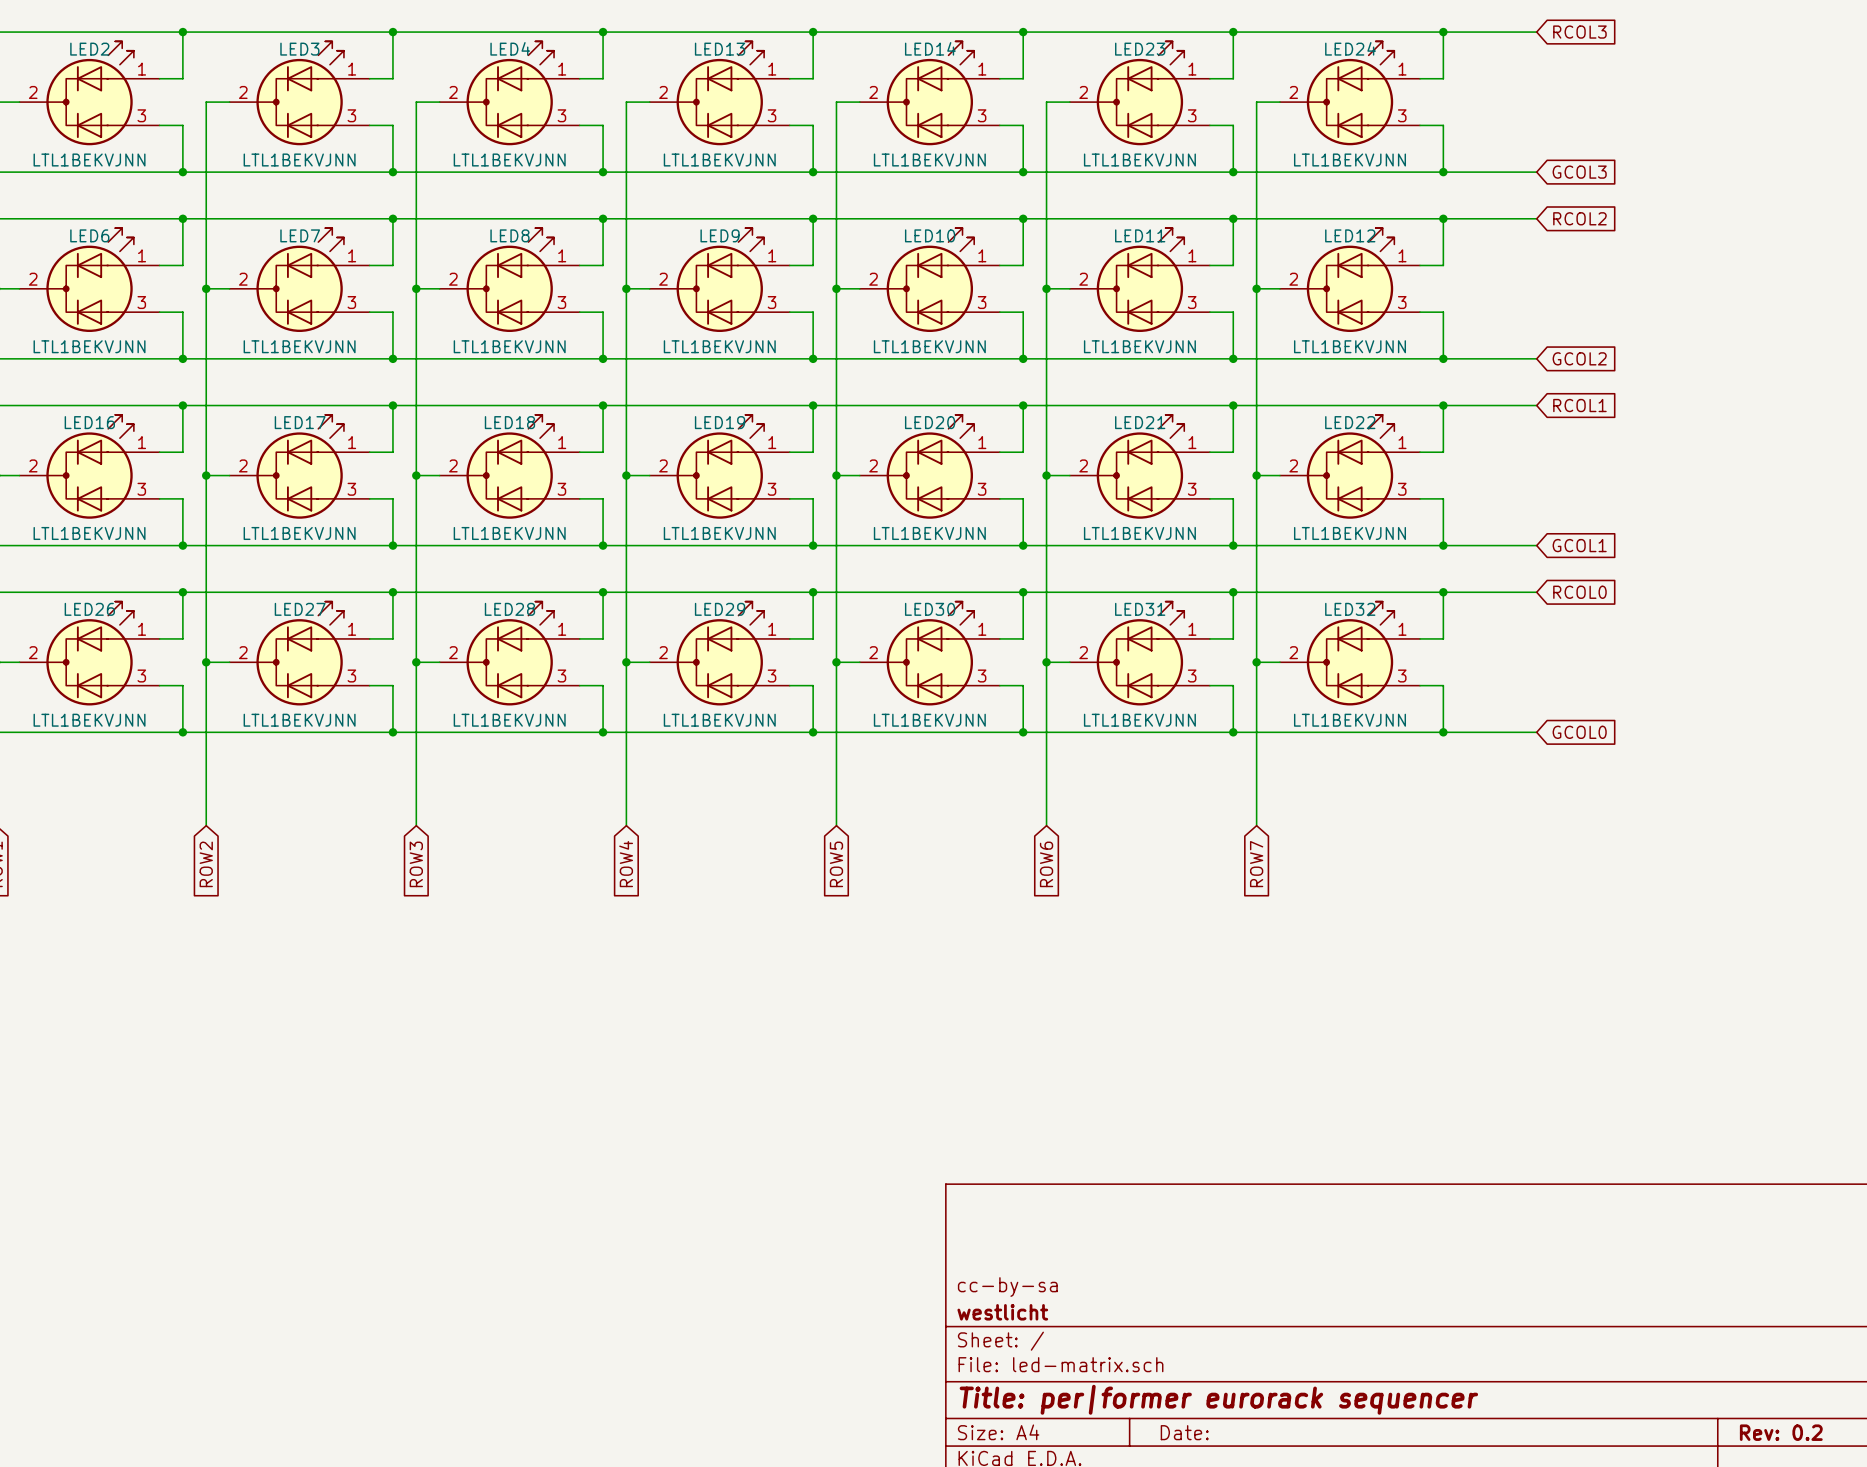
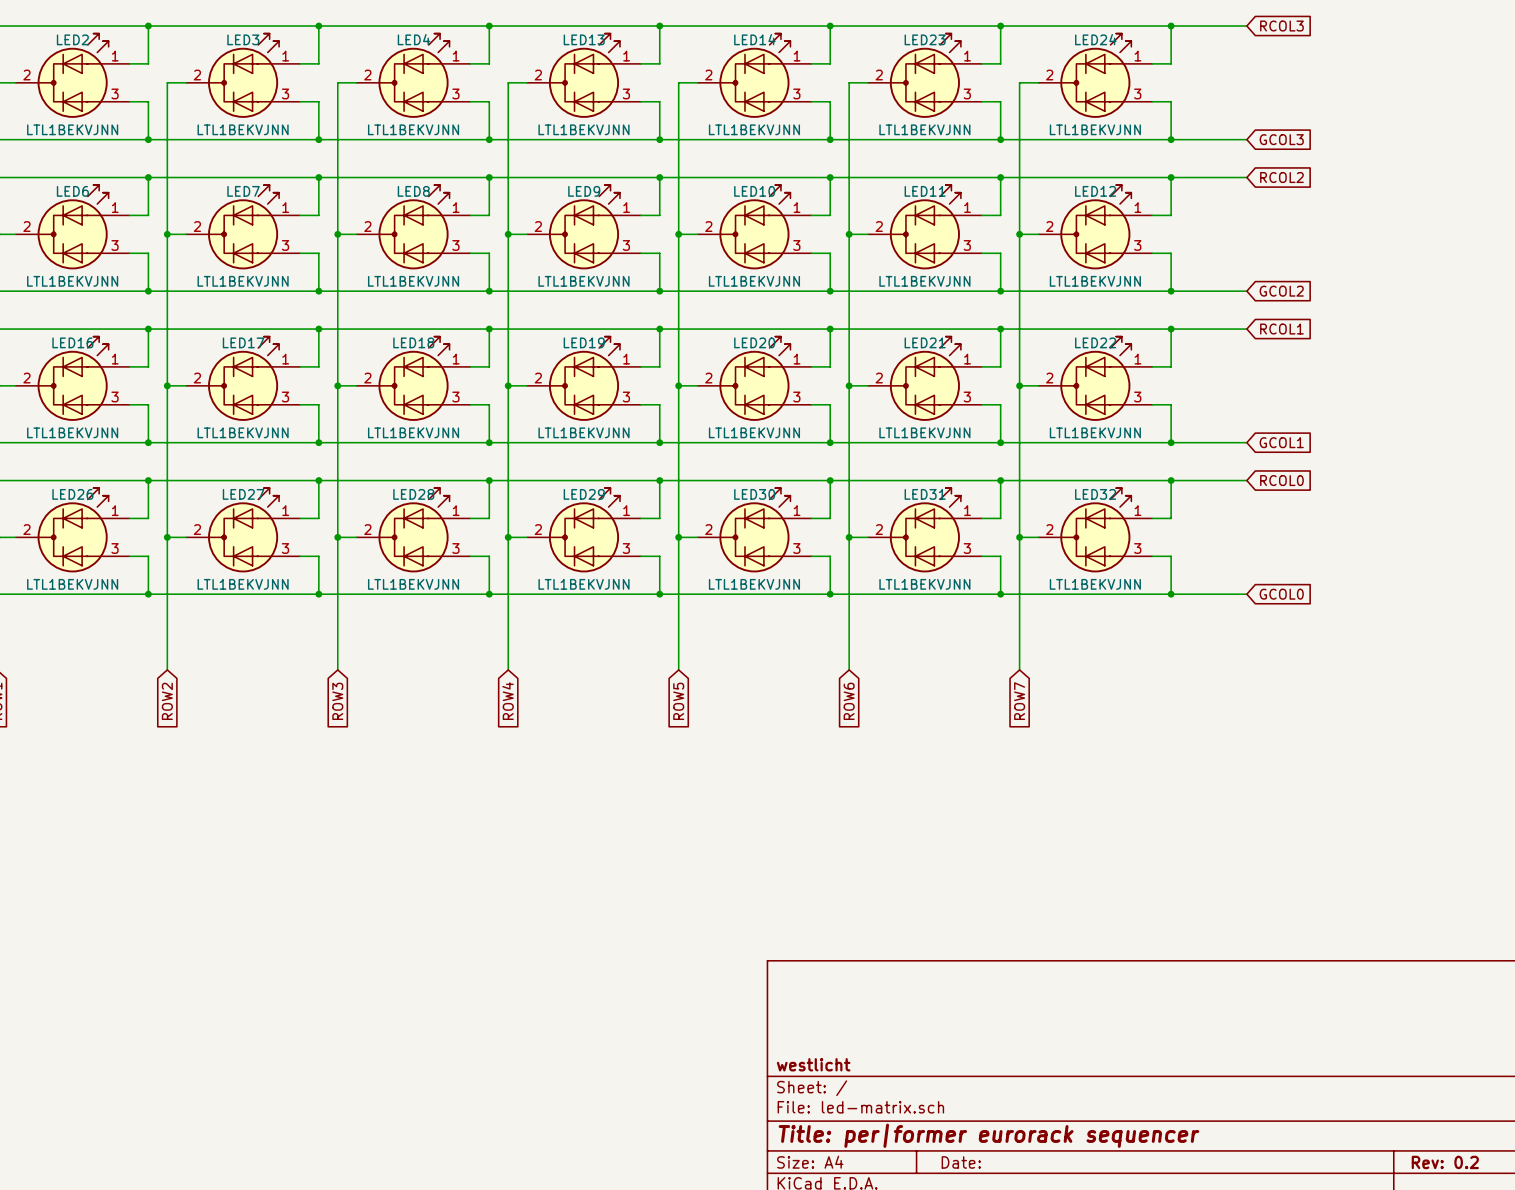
title block: cc-by-sa (1007, 1287) -> none

